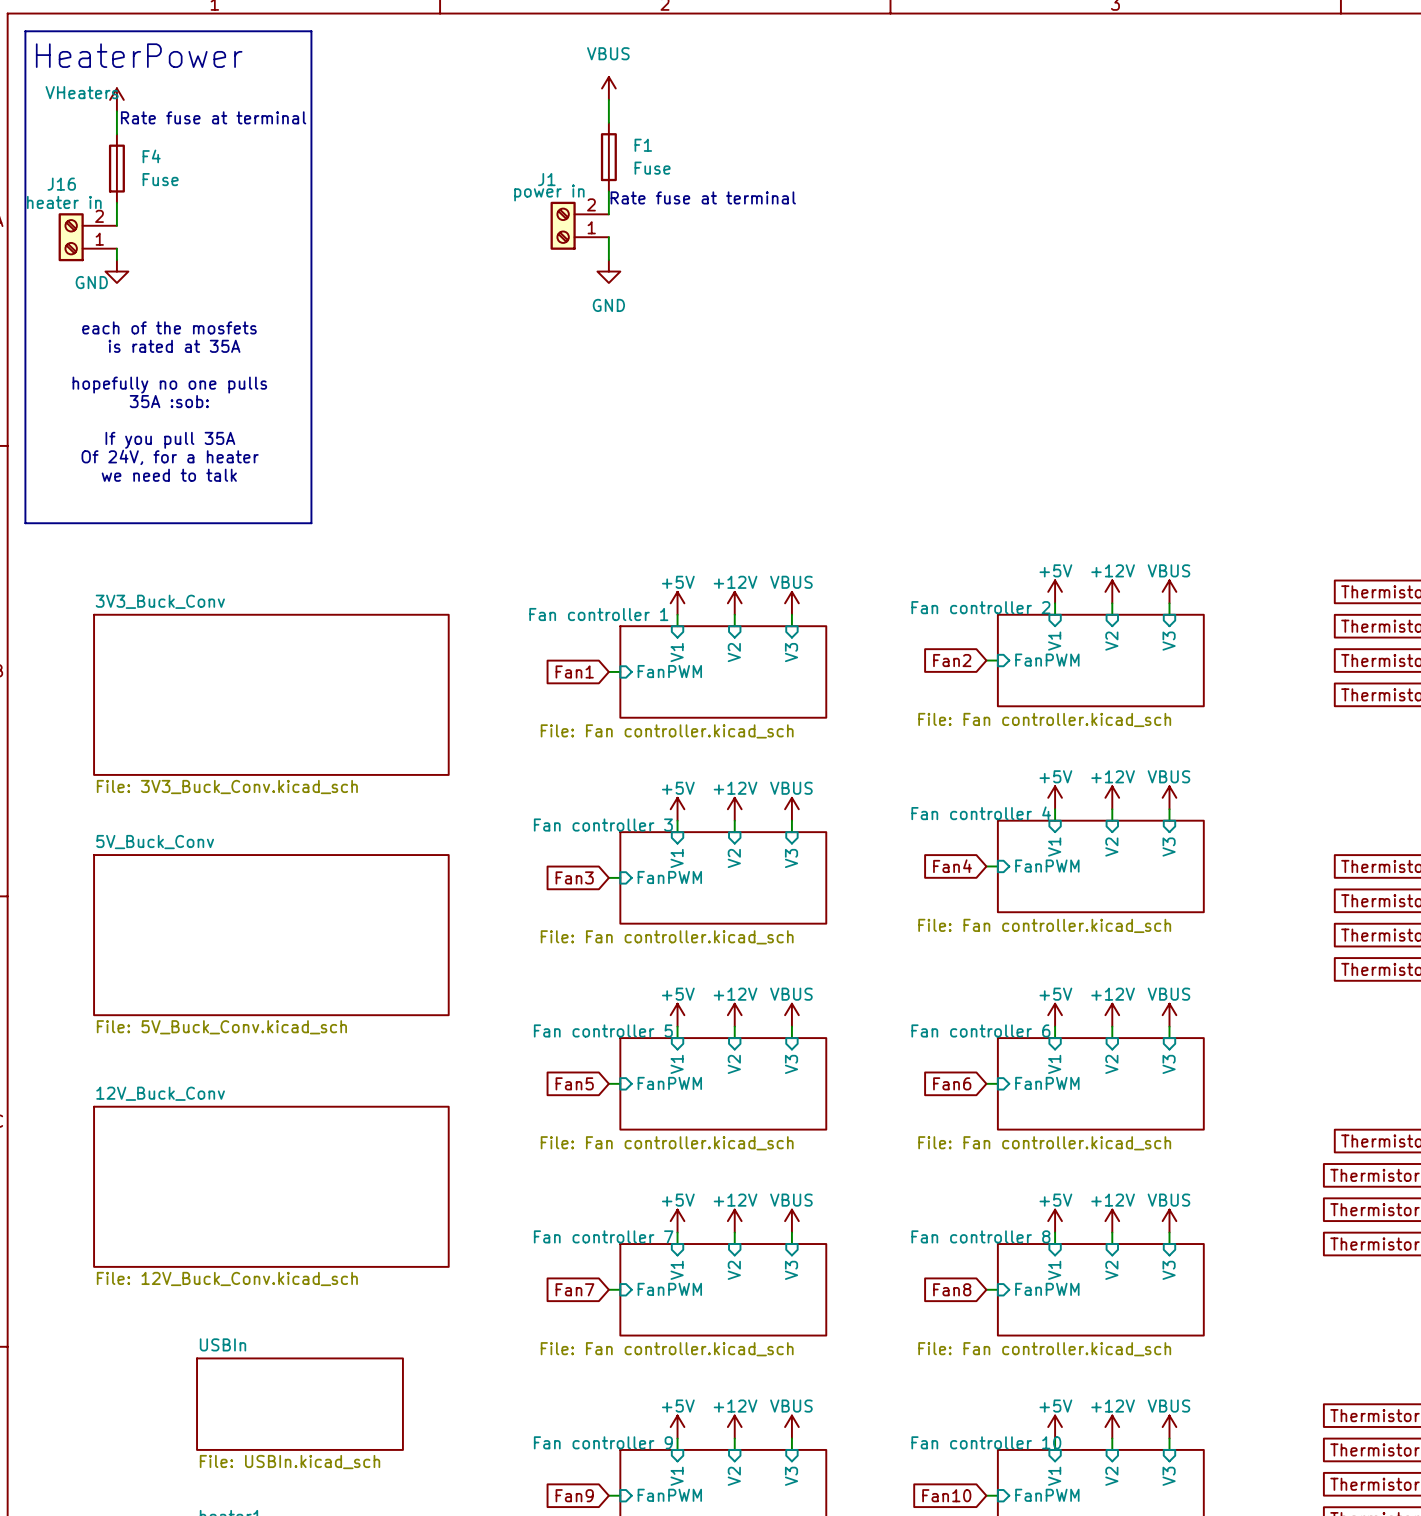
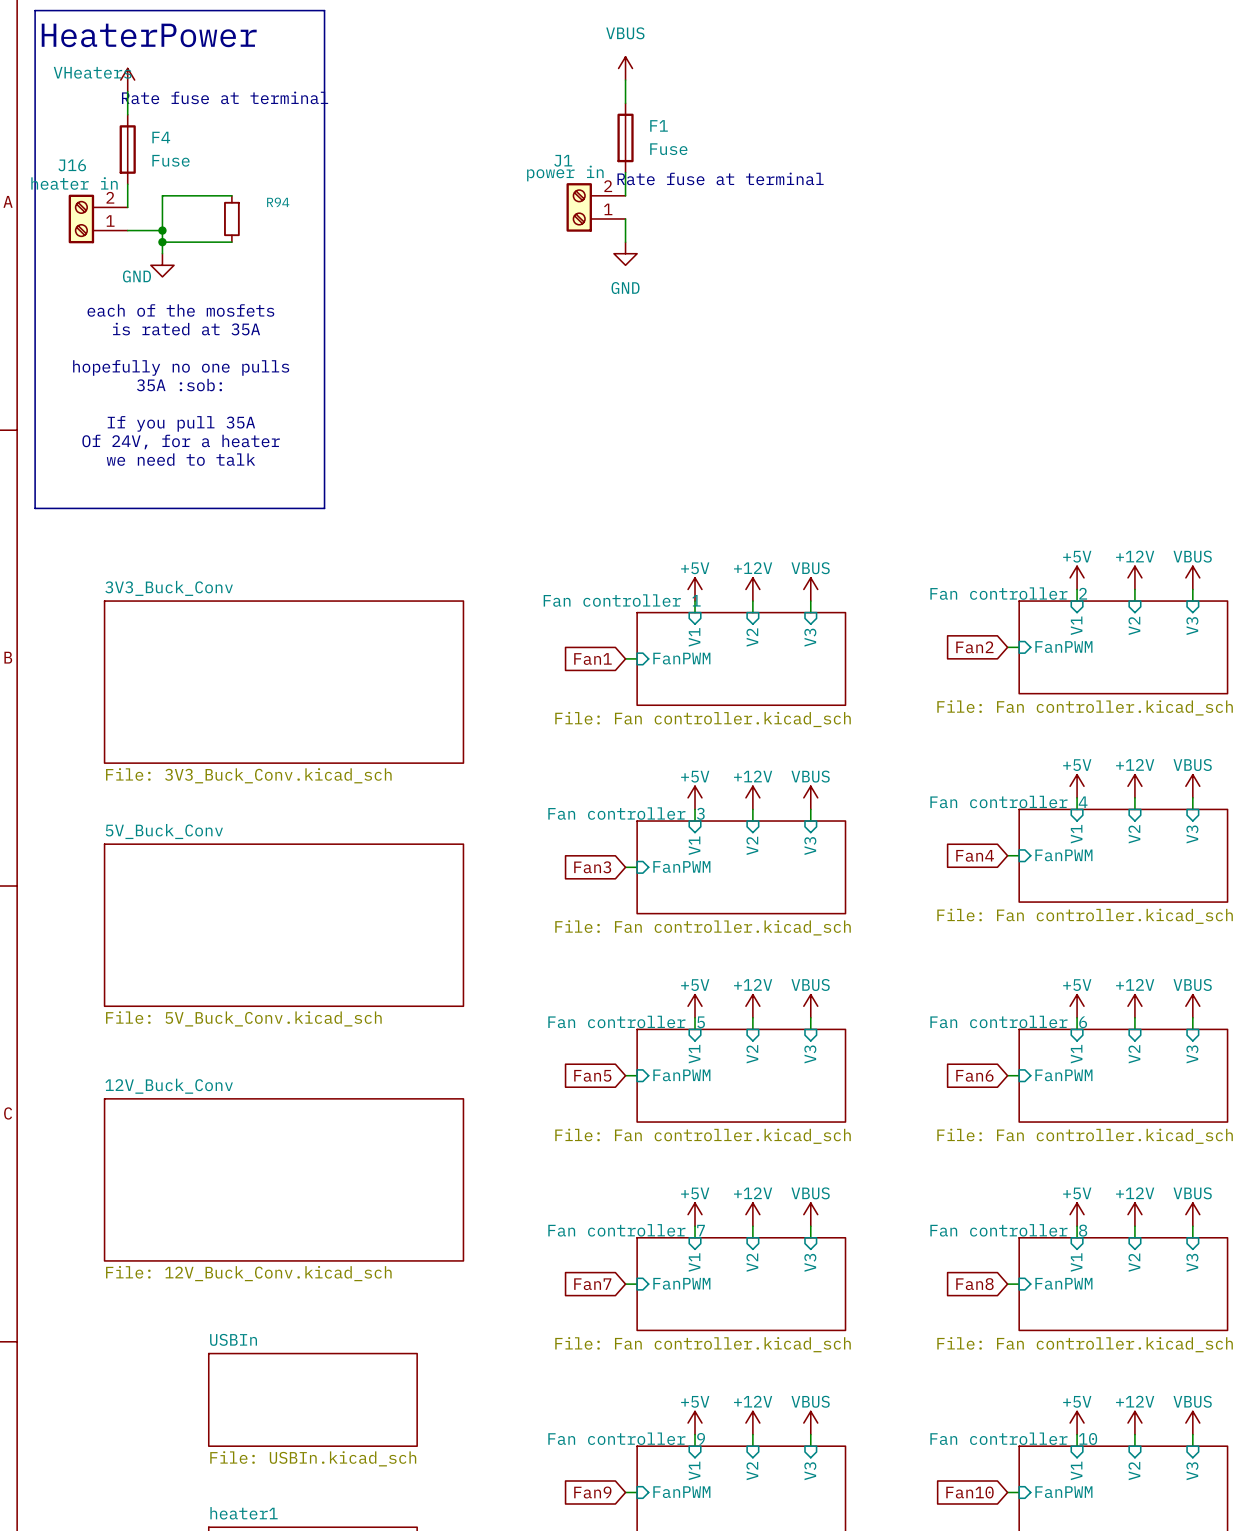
wire: none -> (231, 195) (162, 195) (162, 253)
R94: none -> (231, 218)
wire: (116, 248) (116, 260) -> (127, 230) (162, 230)
junction: none -> (162, 230)
wire: none -> (162, 242) (231, 242)
junction: none -> (162, 242)
power symbol position: GND (116, 271) -> GND (162, 265)

